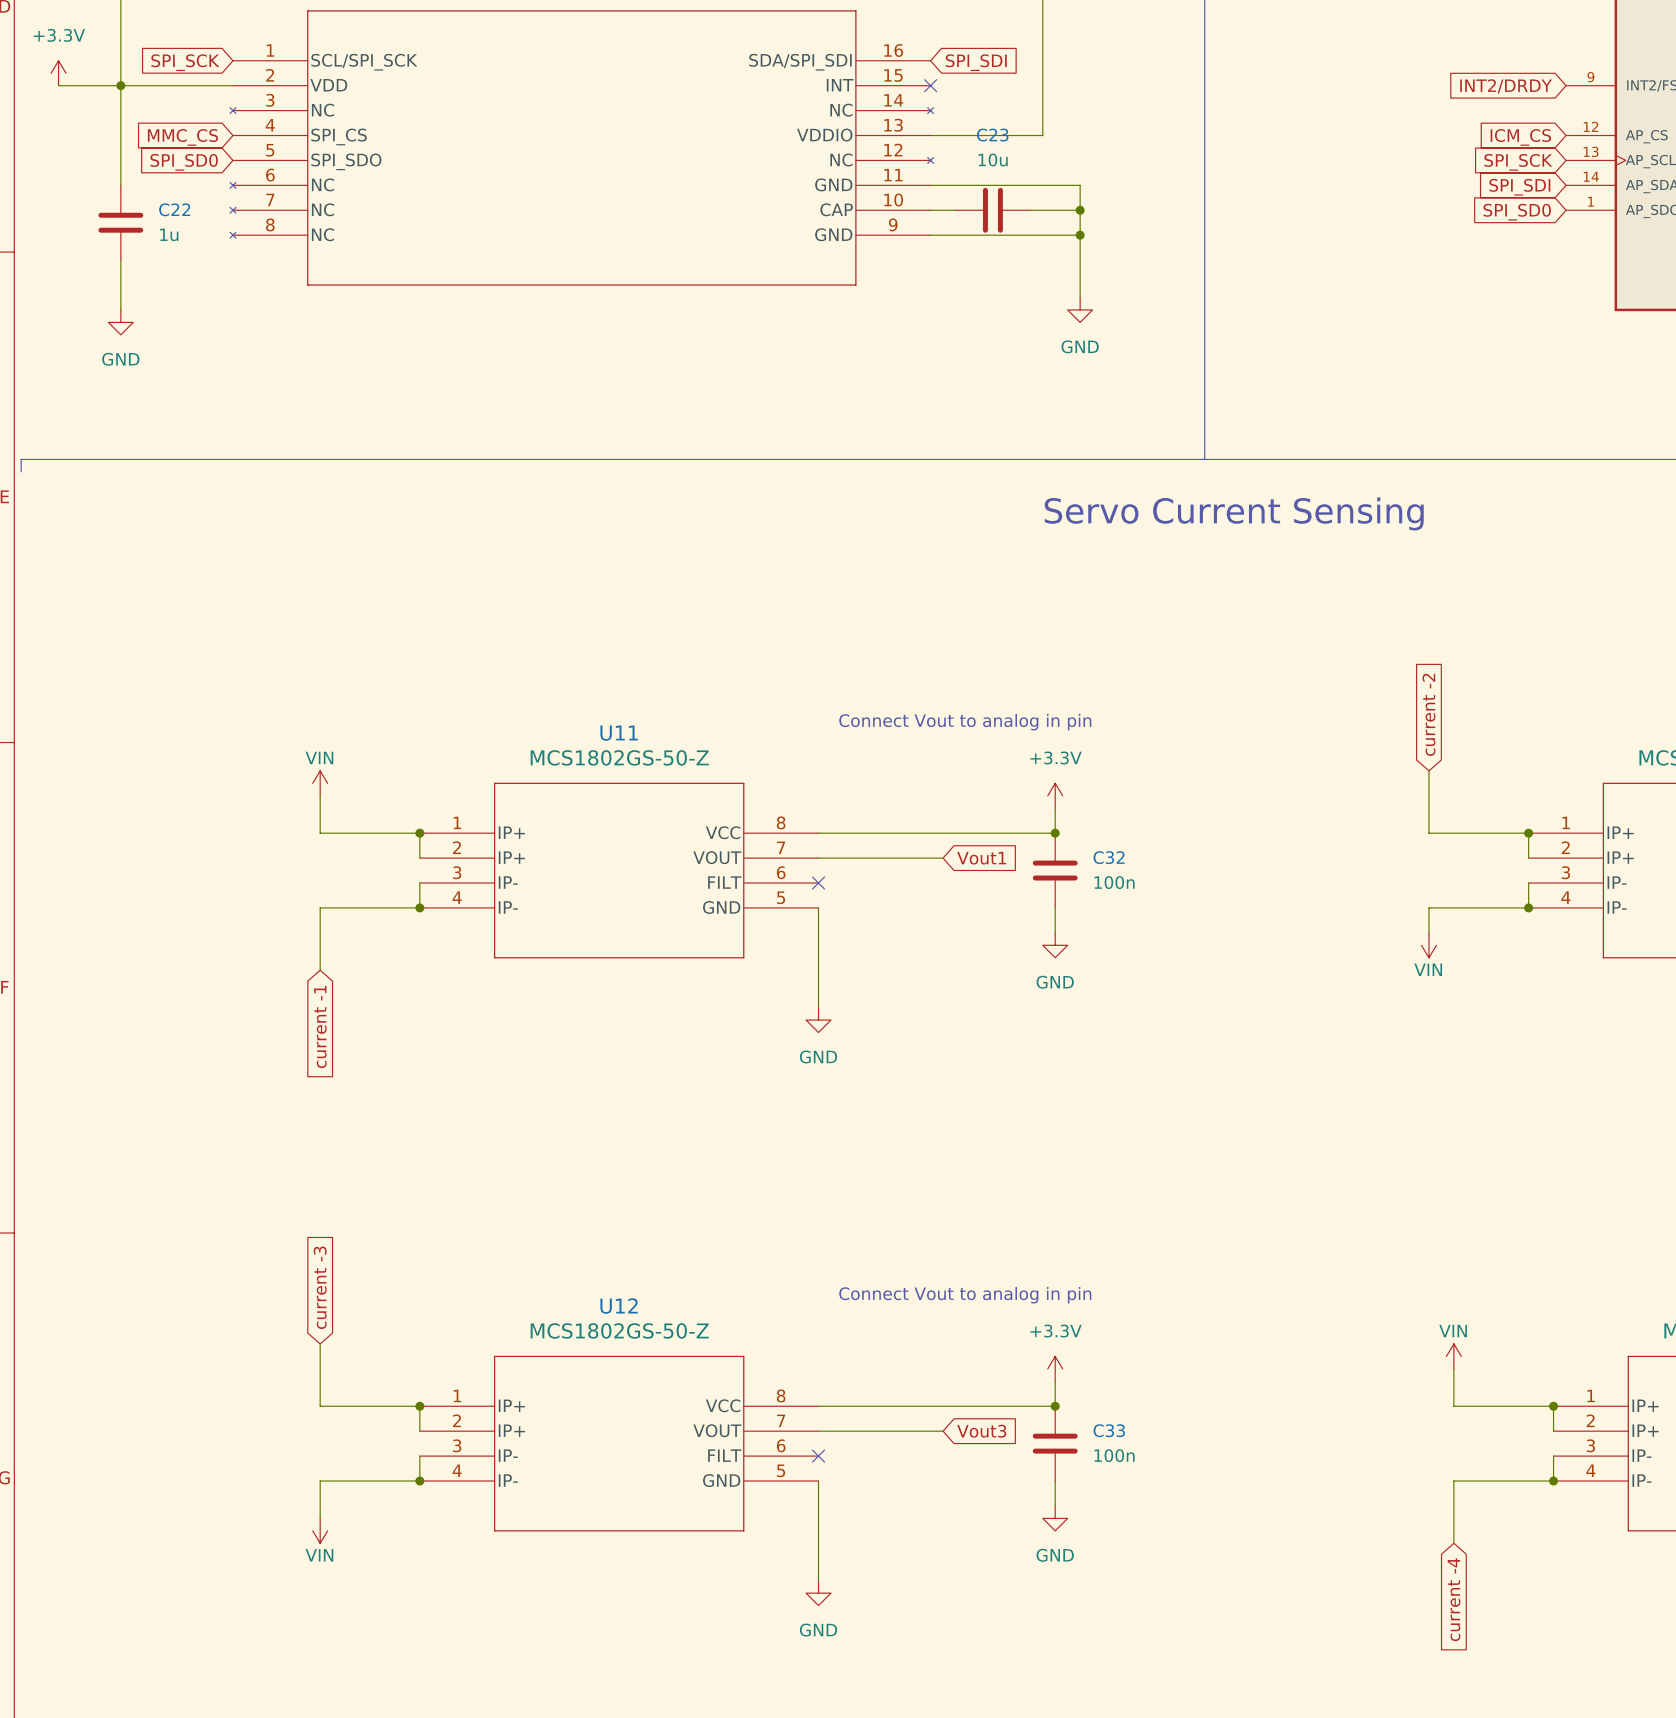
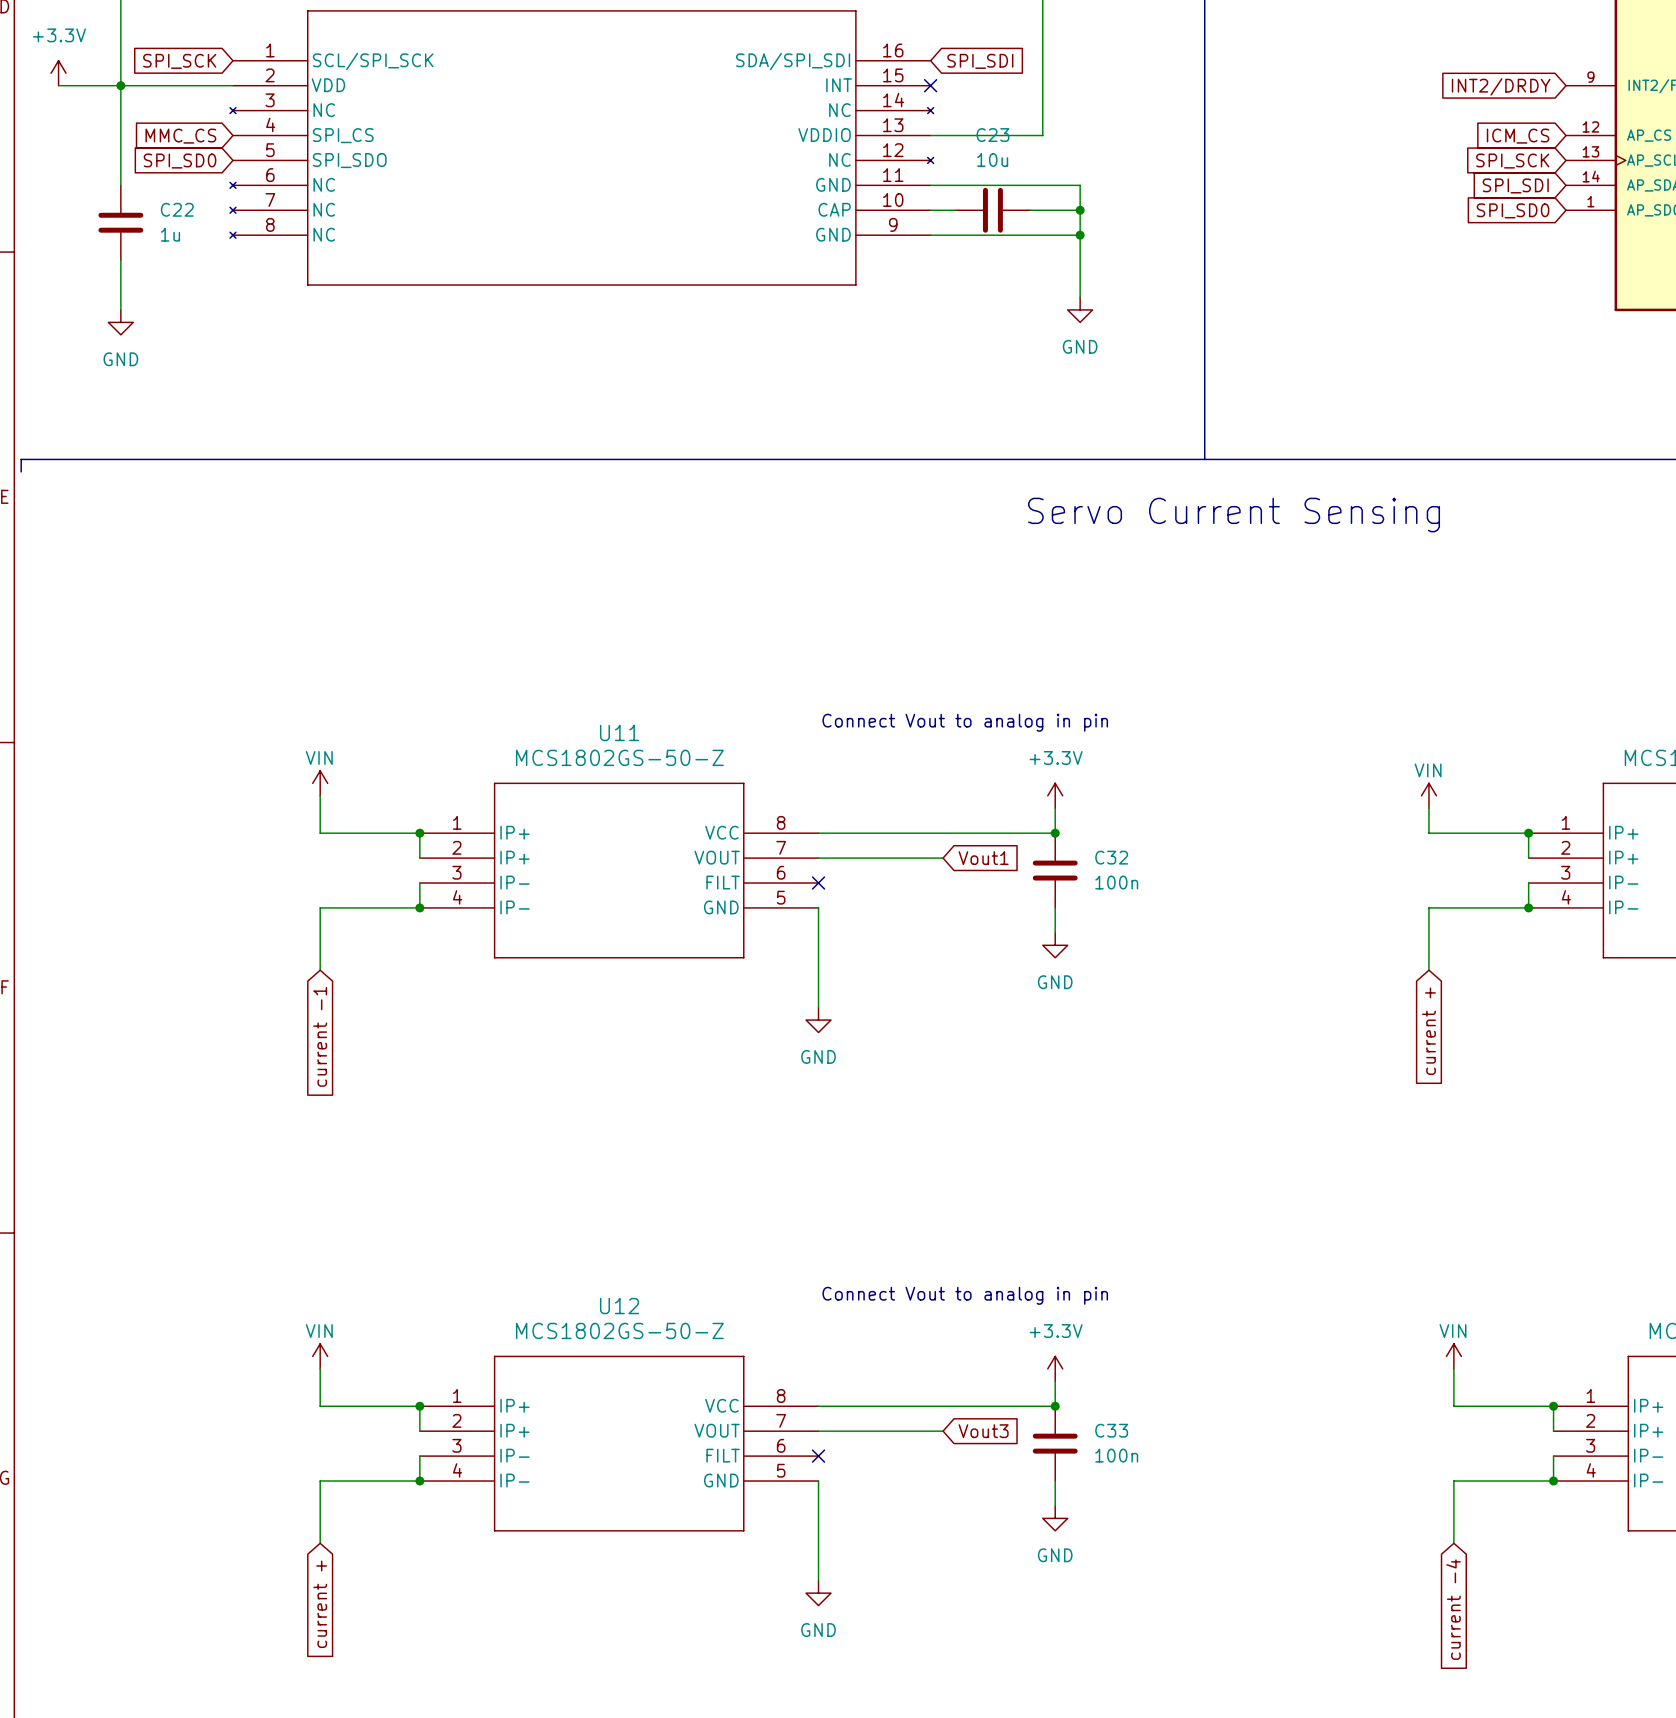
global label: current -2 (1428, 714) -> none
power symbol rotation: 0° (1428, 945) -> 180° (1428, 795)
power symbol position: VIN (1428, 945) -> VIN (1428, 795)
global label: none -> current + (1428, 1031)
global label: current -3 (320, 1287) -> none
power symbol rotation: 0° (320, 1530) -> 180° (320, 1356)
power symbol position: VIN (320, 1530) -> VIN (320, 1356)
global label: none -> current + (320, 1604)

